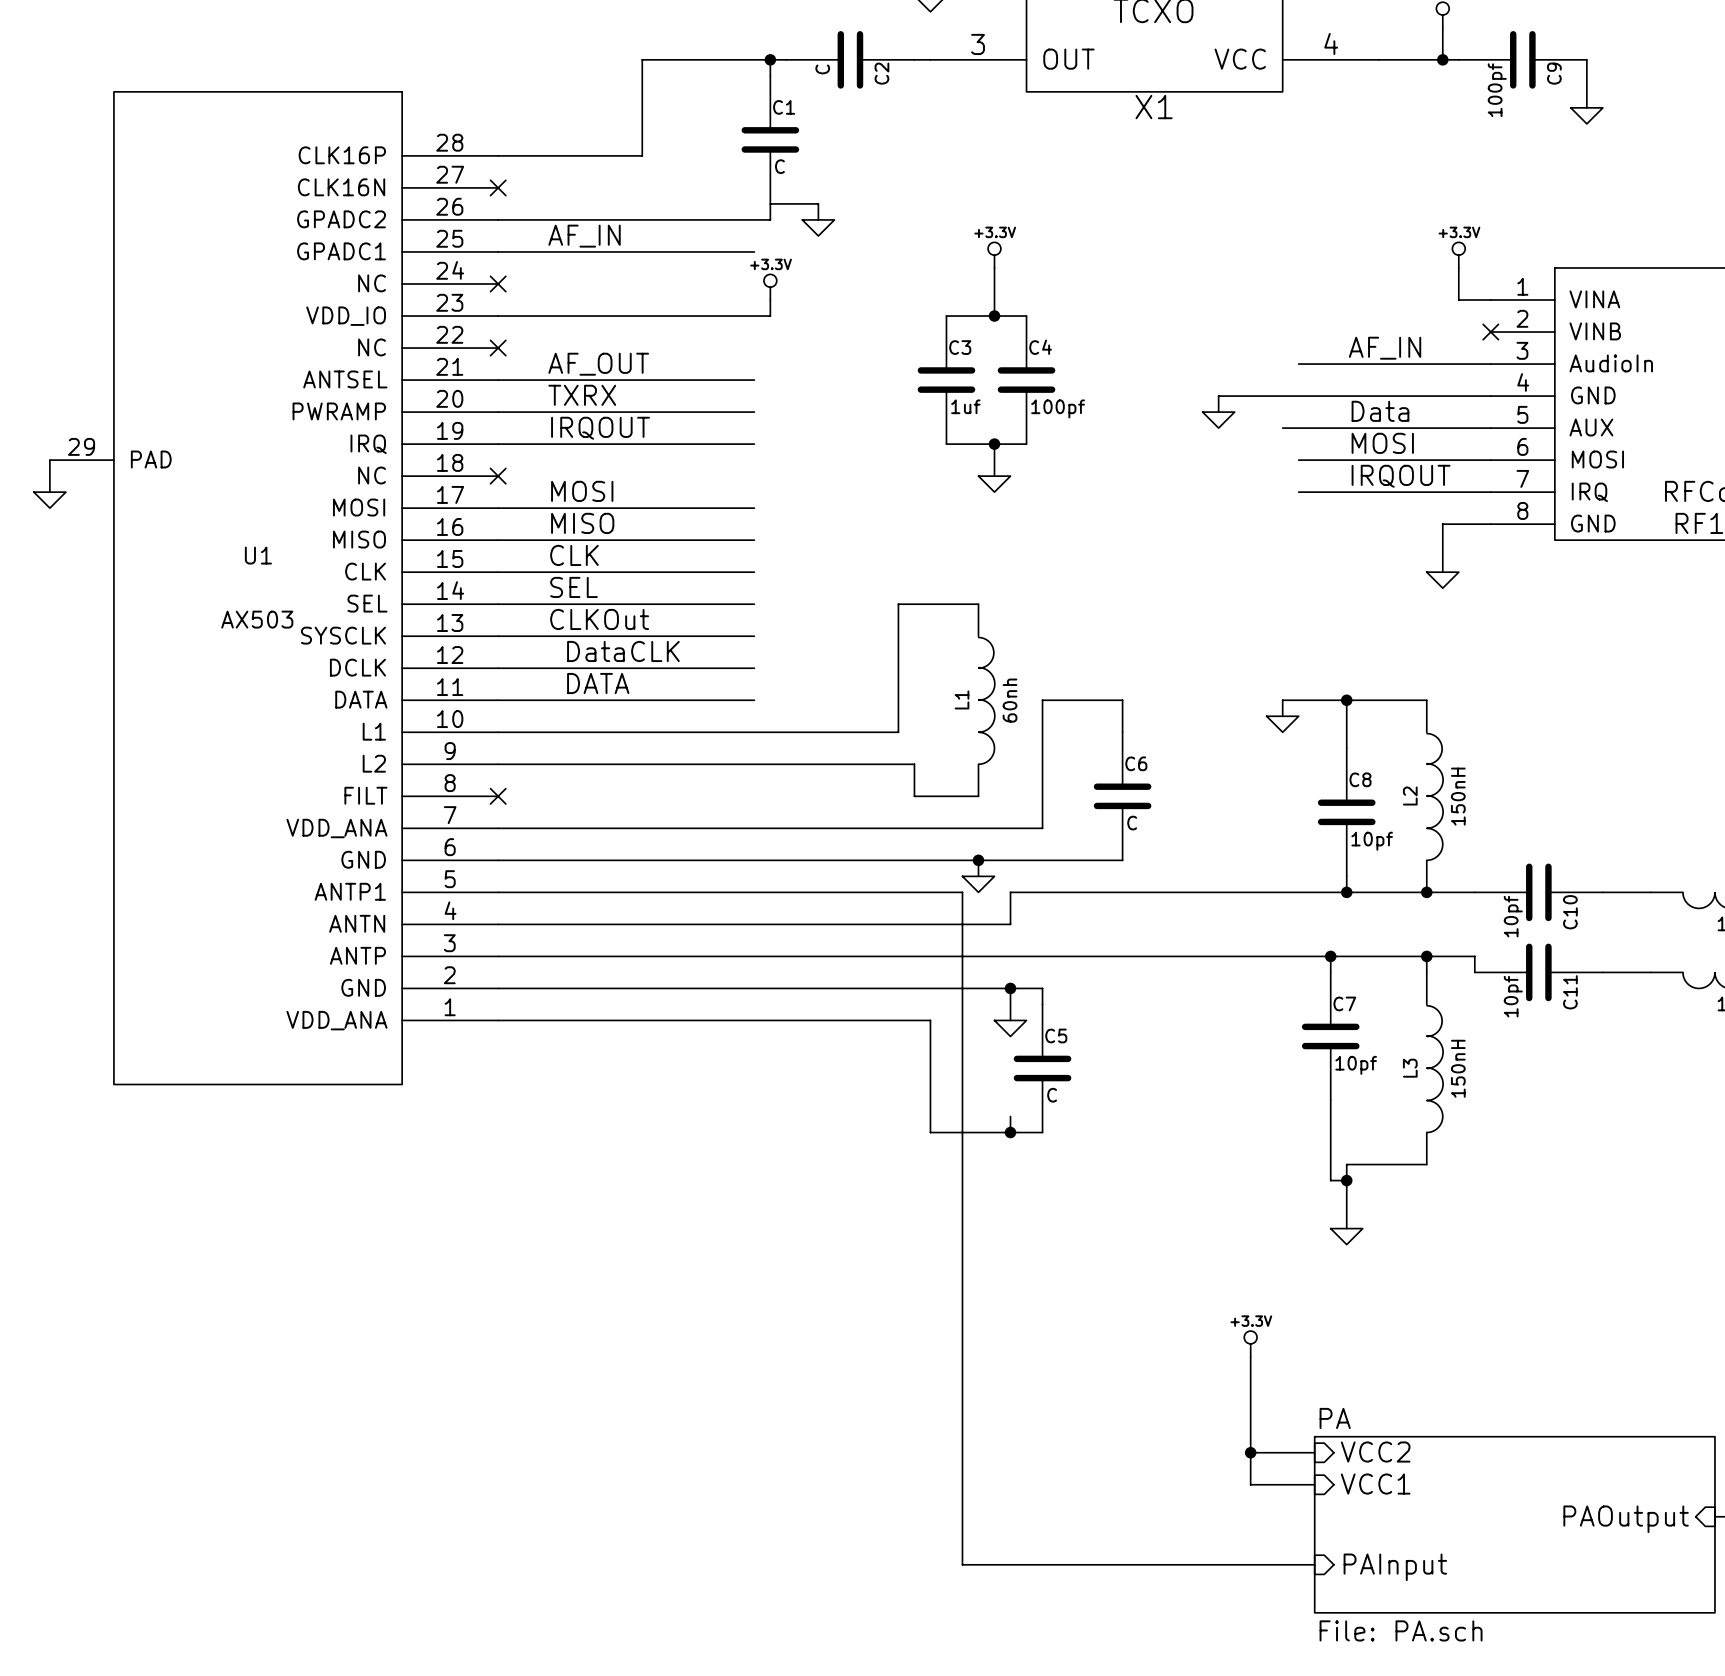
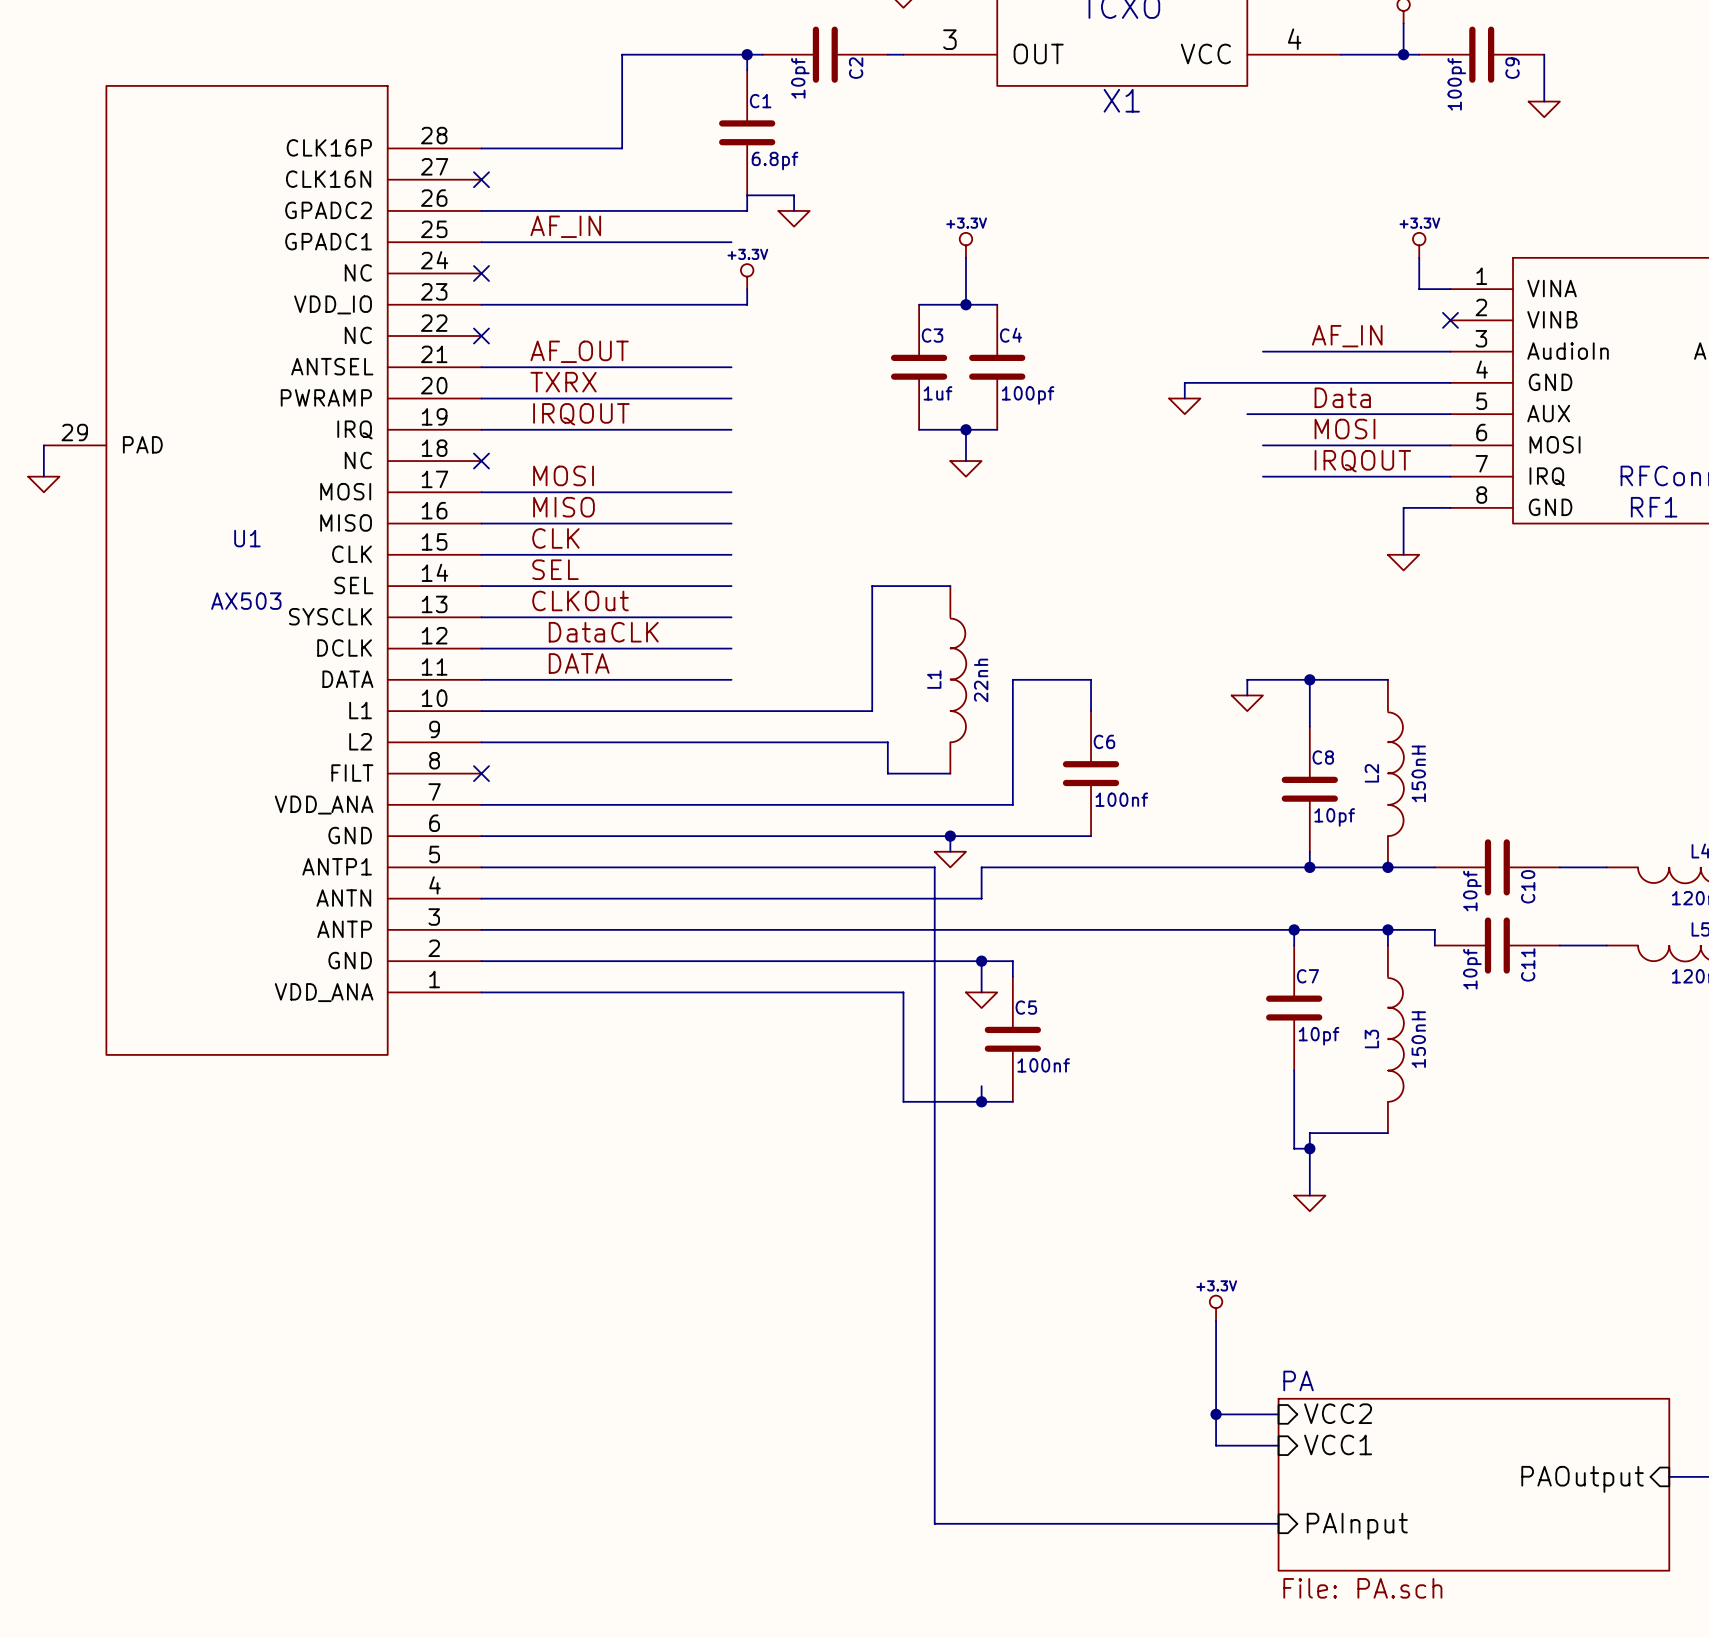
C2 value: C (822, 69) -> 10pf (800, 78)
C1 value: C (779, 166) -> 6.8pf (774, 161)
L1 value: 60nh (1010, 700) -> 22nh (981, 680)
C6 value: C (1132, 823) -> 100nf (1121, 799)
C5 value: C (1052, 1095) -> 100nf (1043, 1065)

